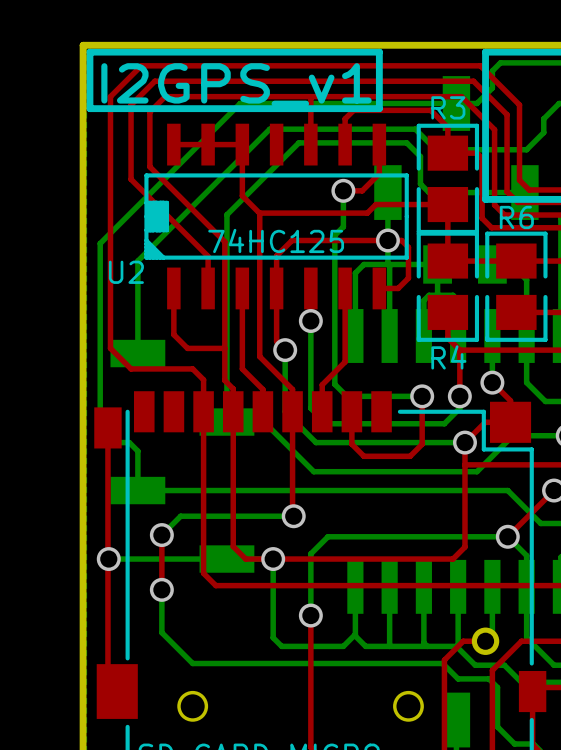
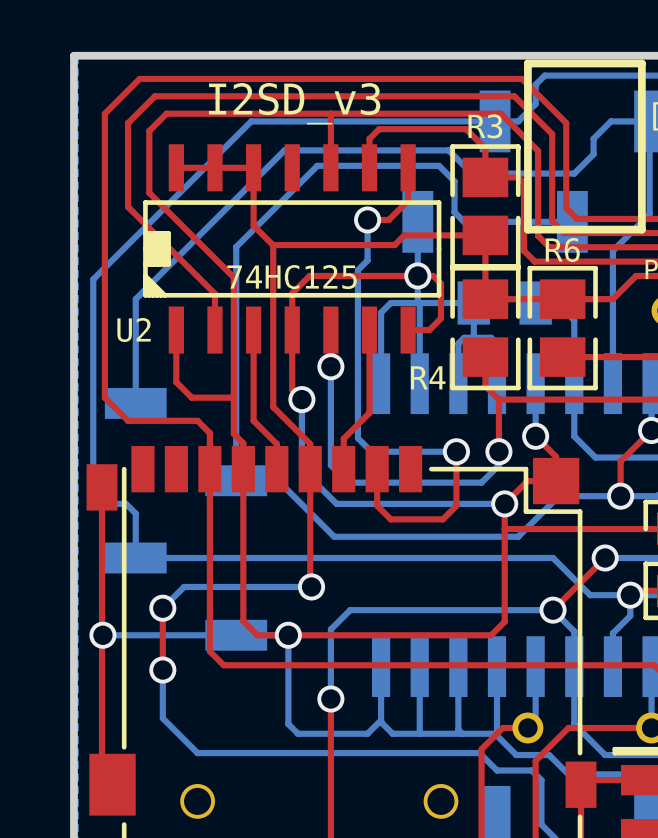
line: (89, 52) (379, 52) (379, 108) (89, 108) (89, 52) -> none
text: I2GPS_v1 (236, 85) -> I2SD_v3 (294, 103)
U2 name position: U2 (126, 272) -> U2 (134, 329)
R4 name position: R4 (448, 357) -> R4 (428, 377)

